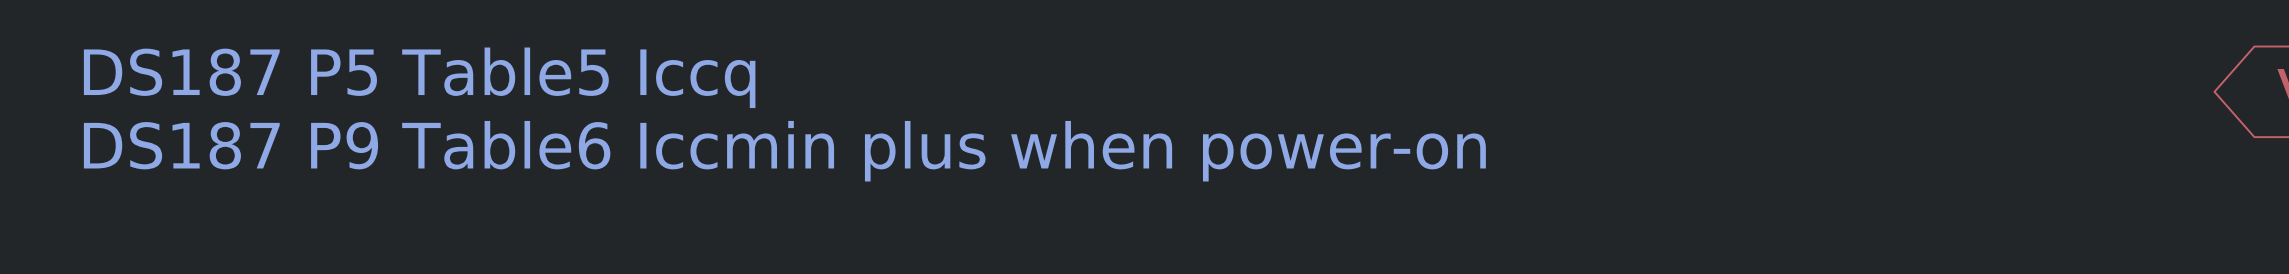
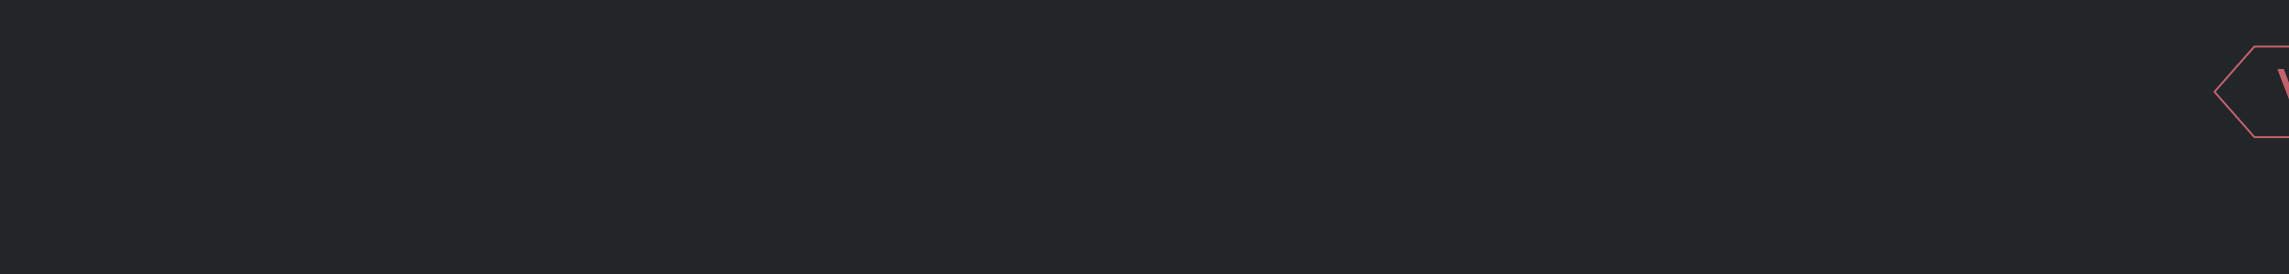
text: DS187 P5 Table5 Iccq (419, 77) -> none
text: DS187 P9 Table6 Iccmin plus when power-on (784, 151) -> none

